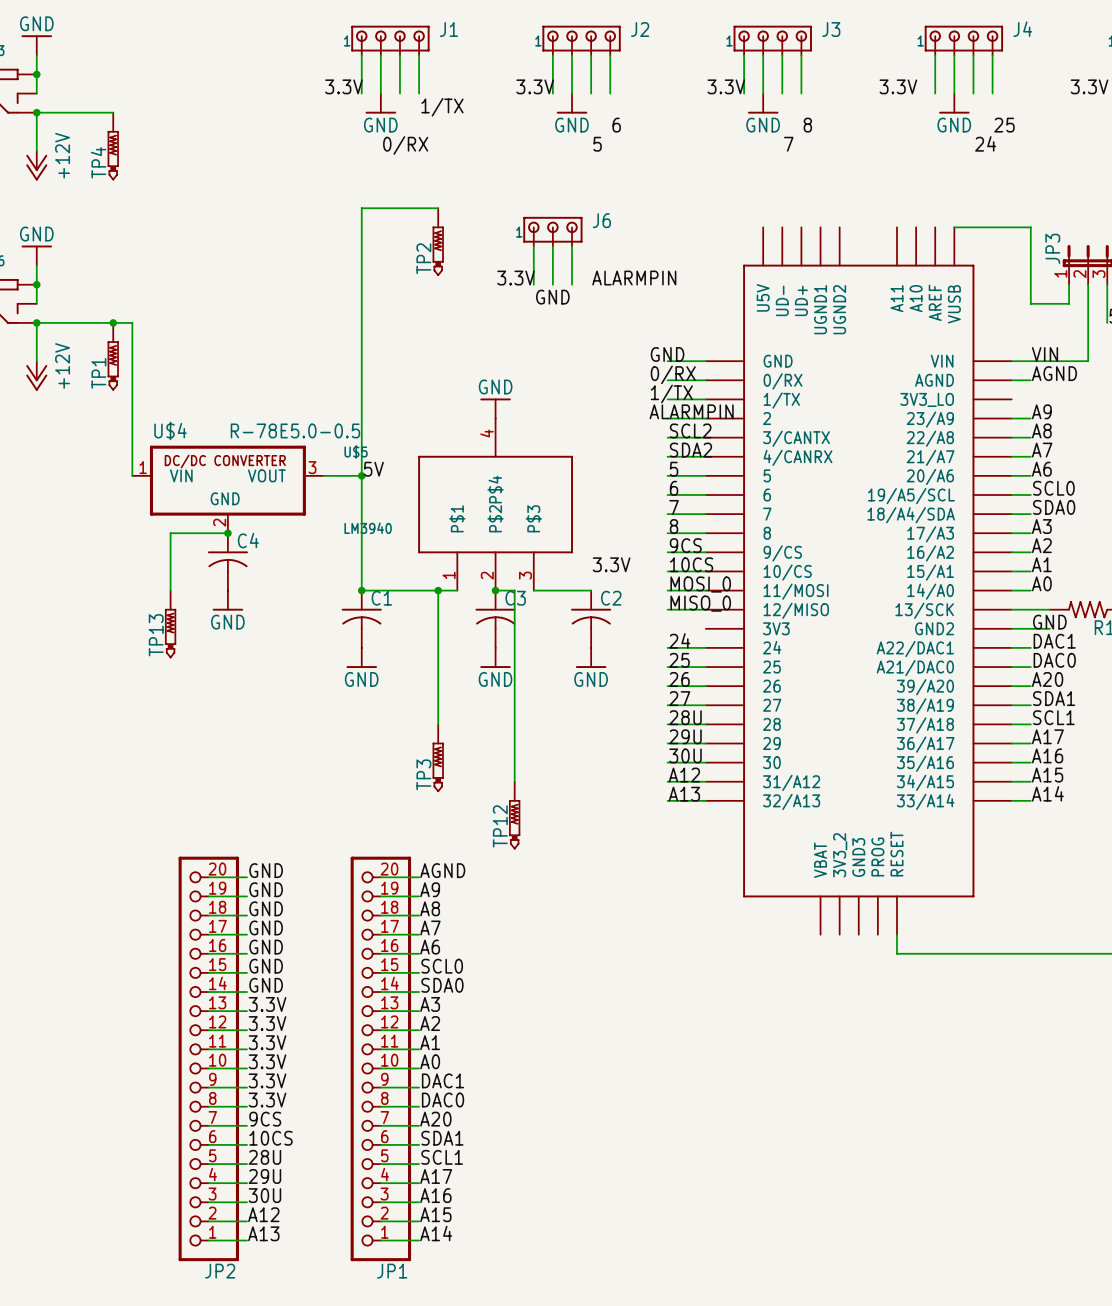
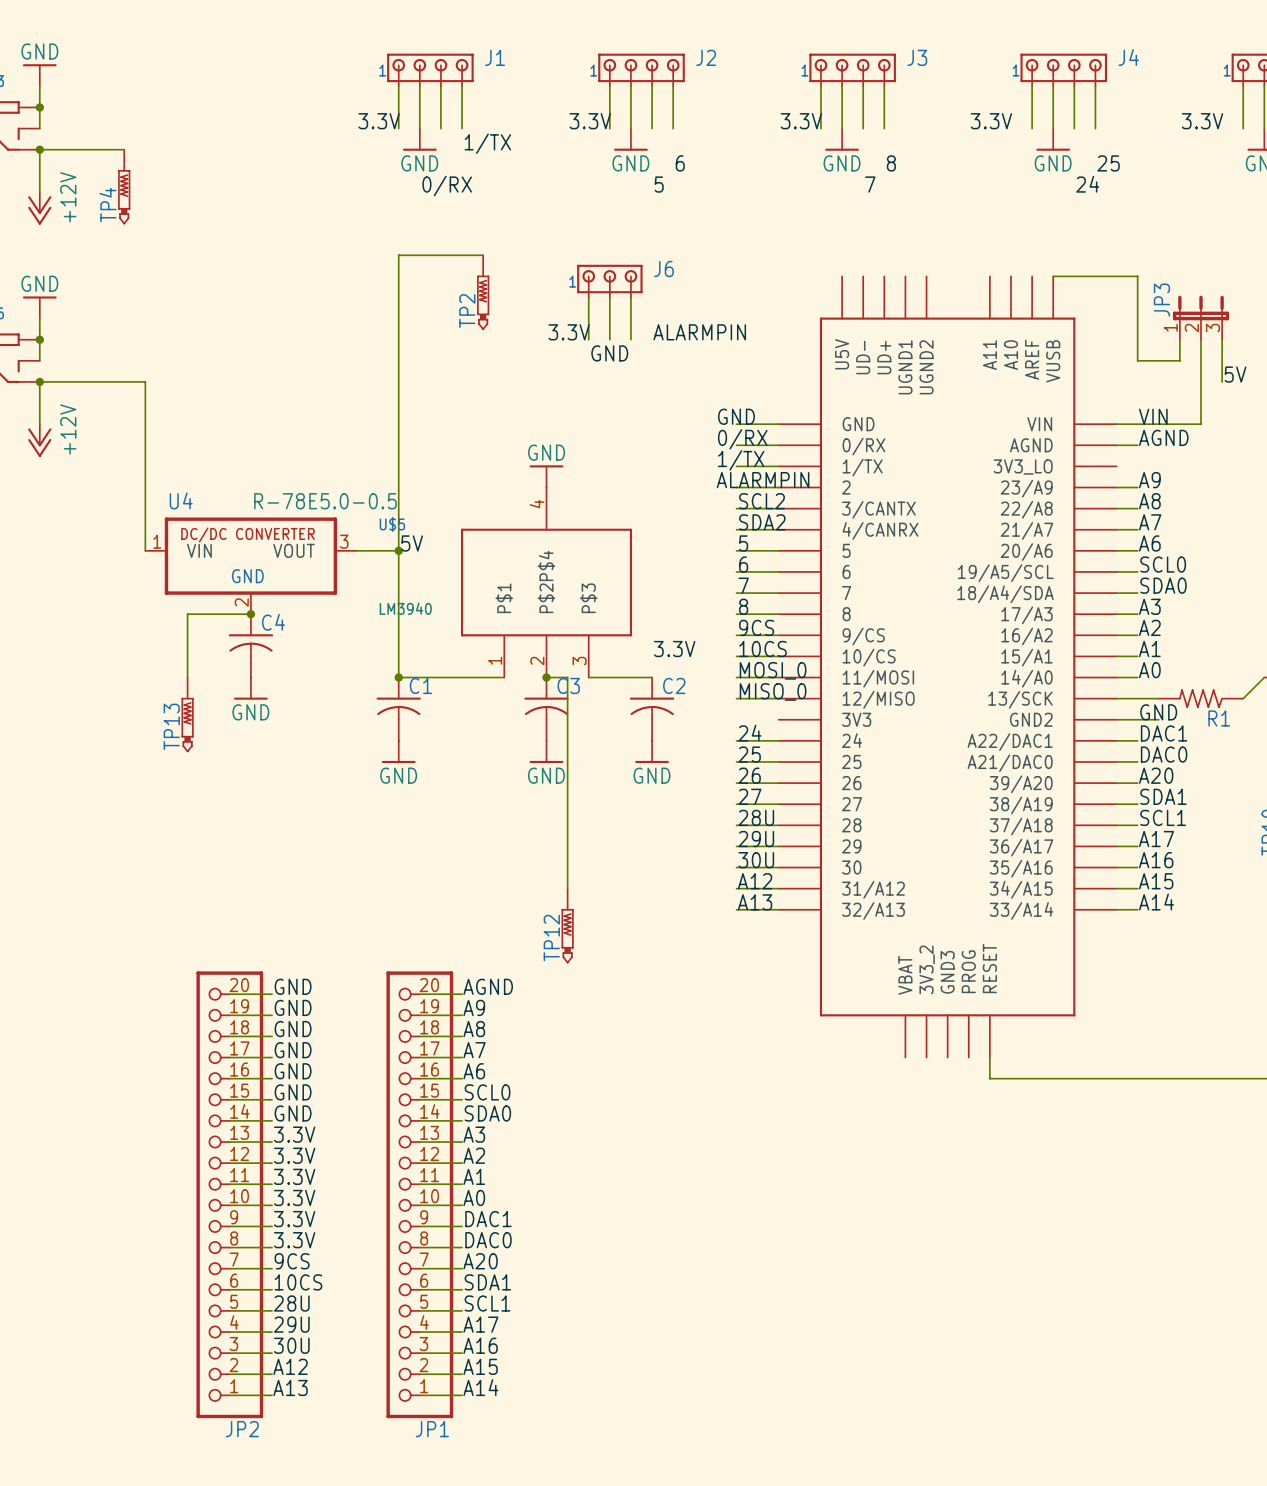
junction: (113, 322) -> none
TP1: (113, 356) -> none
U$4 name: U$4 (170, 430) -> U4 (181, 500)
wire: (438, 590) (438, 724) -> none
junction: (438, 590) -> none
TP3: (438, 758) -> none

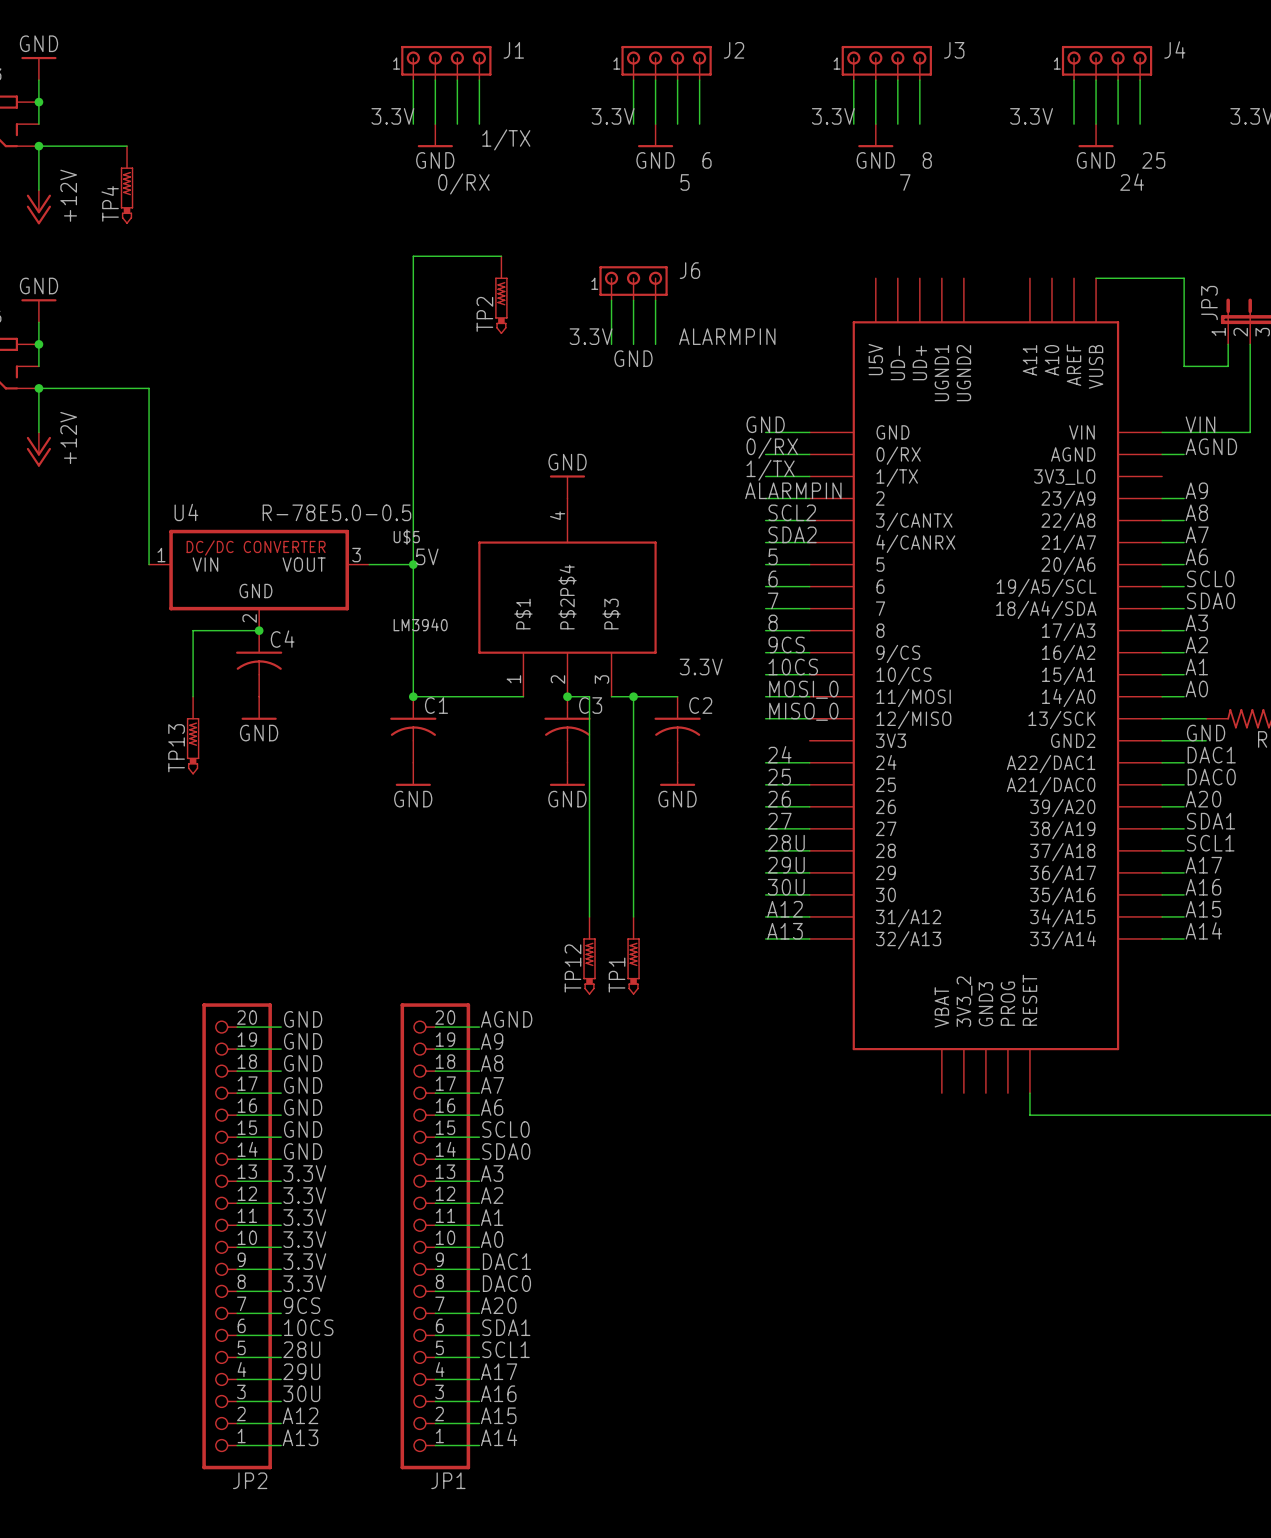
wire: none -> (633, 696) (633, 916)
junction: none -> (633, 696)
TP1: none -> (633, 955)

